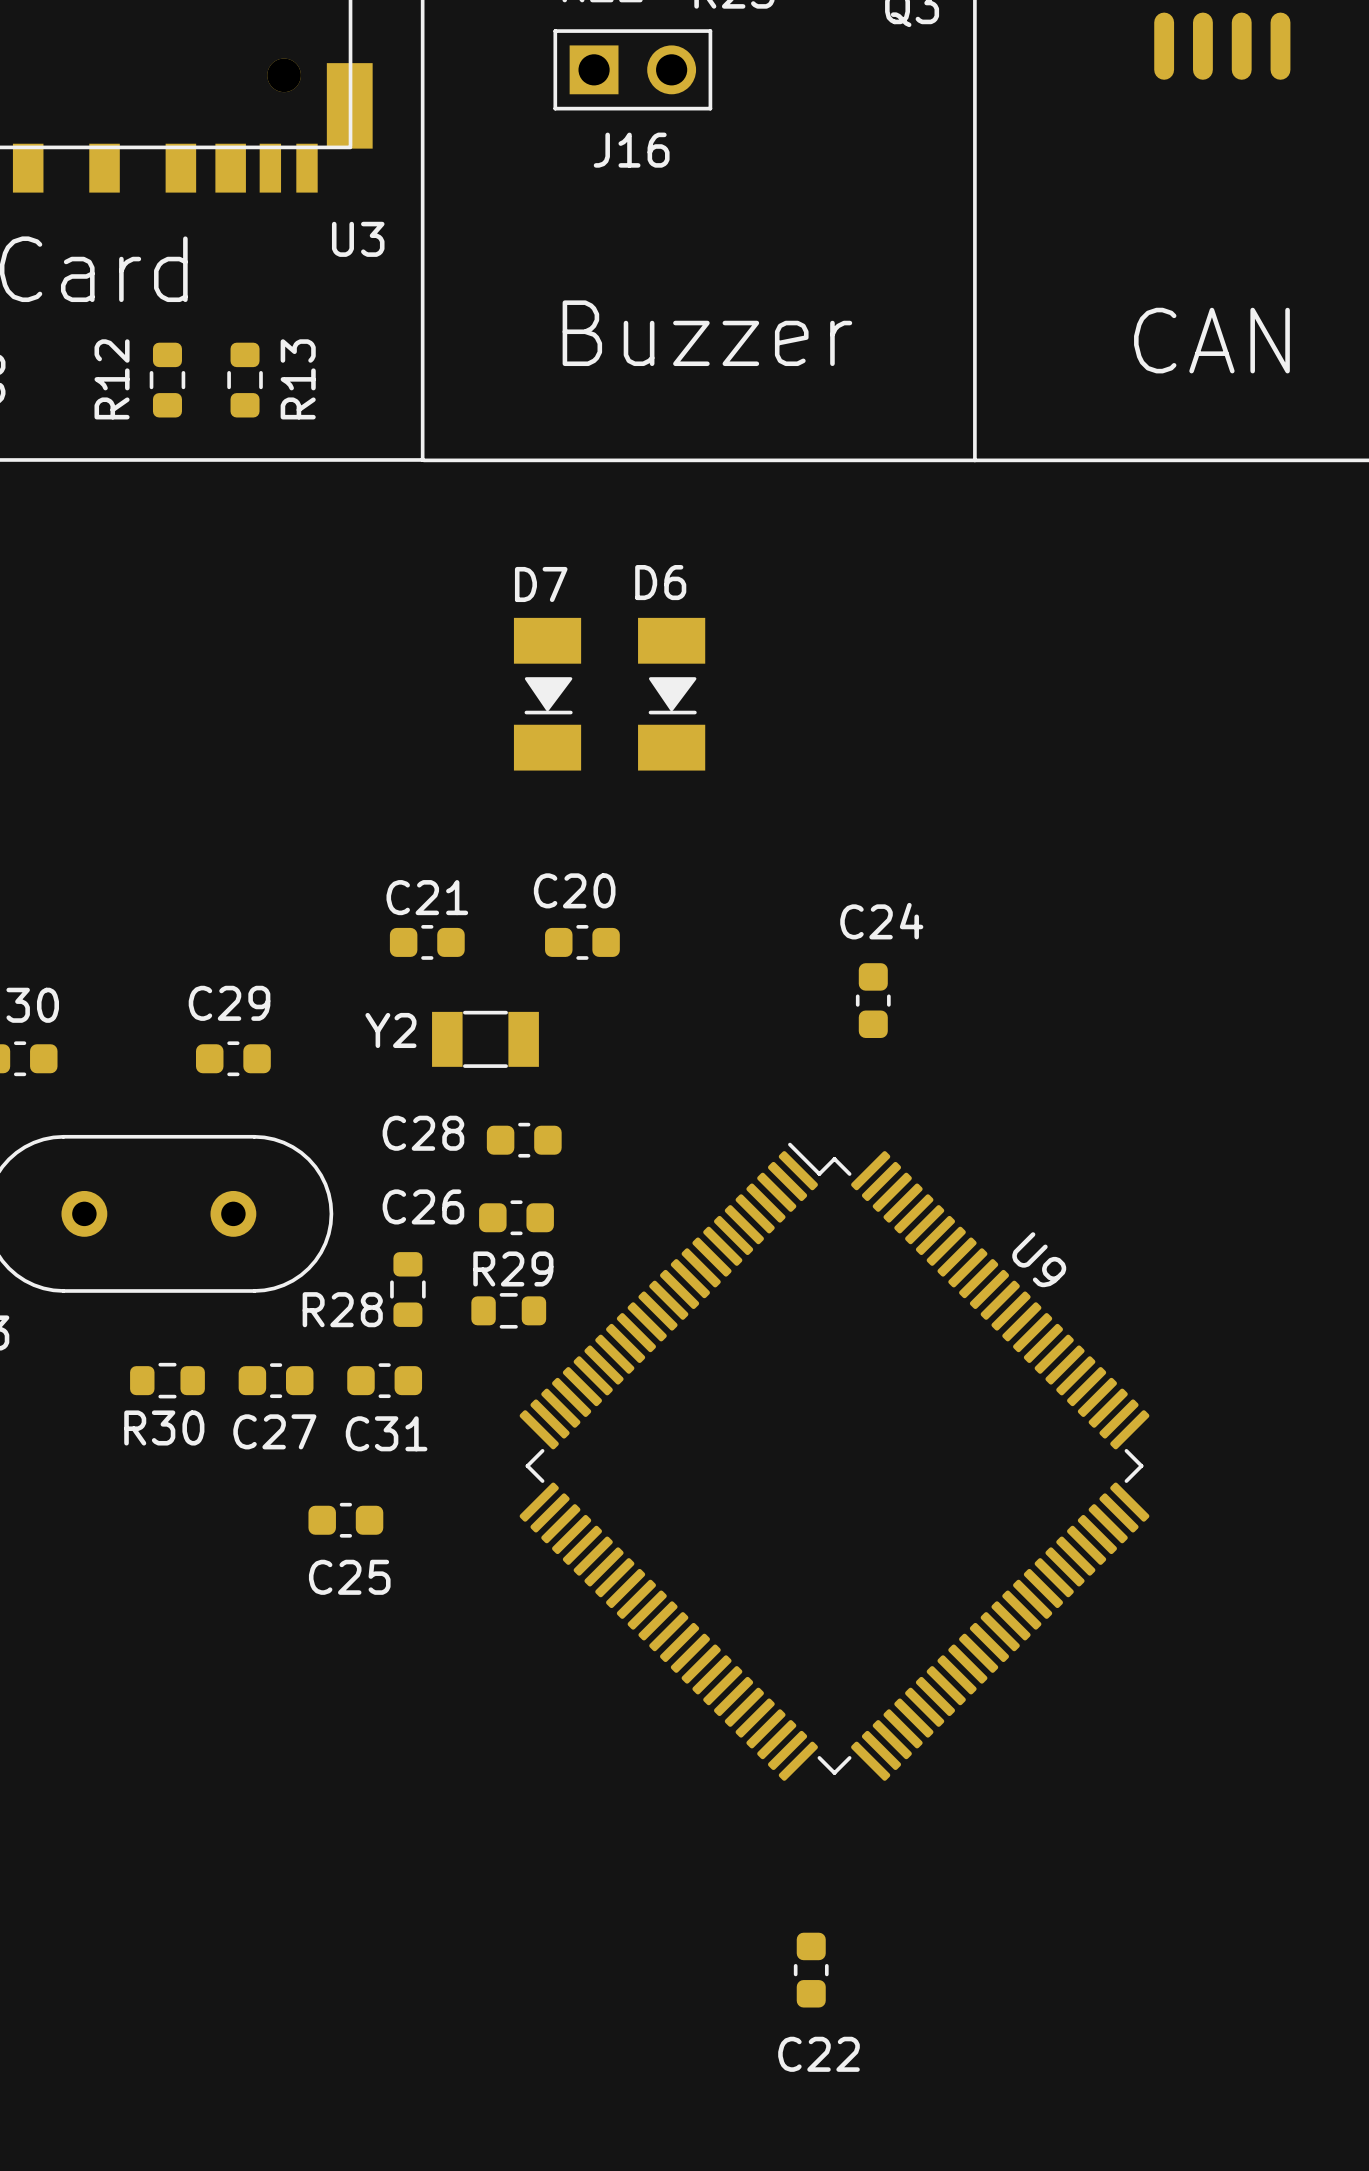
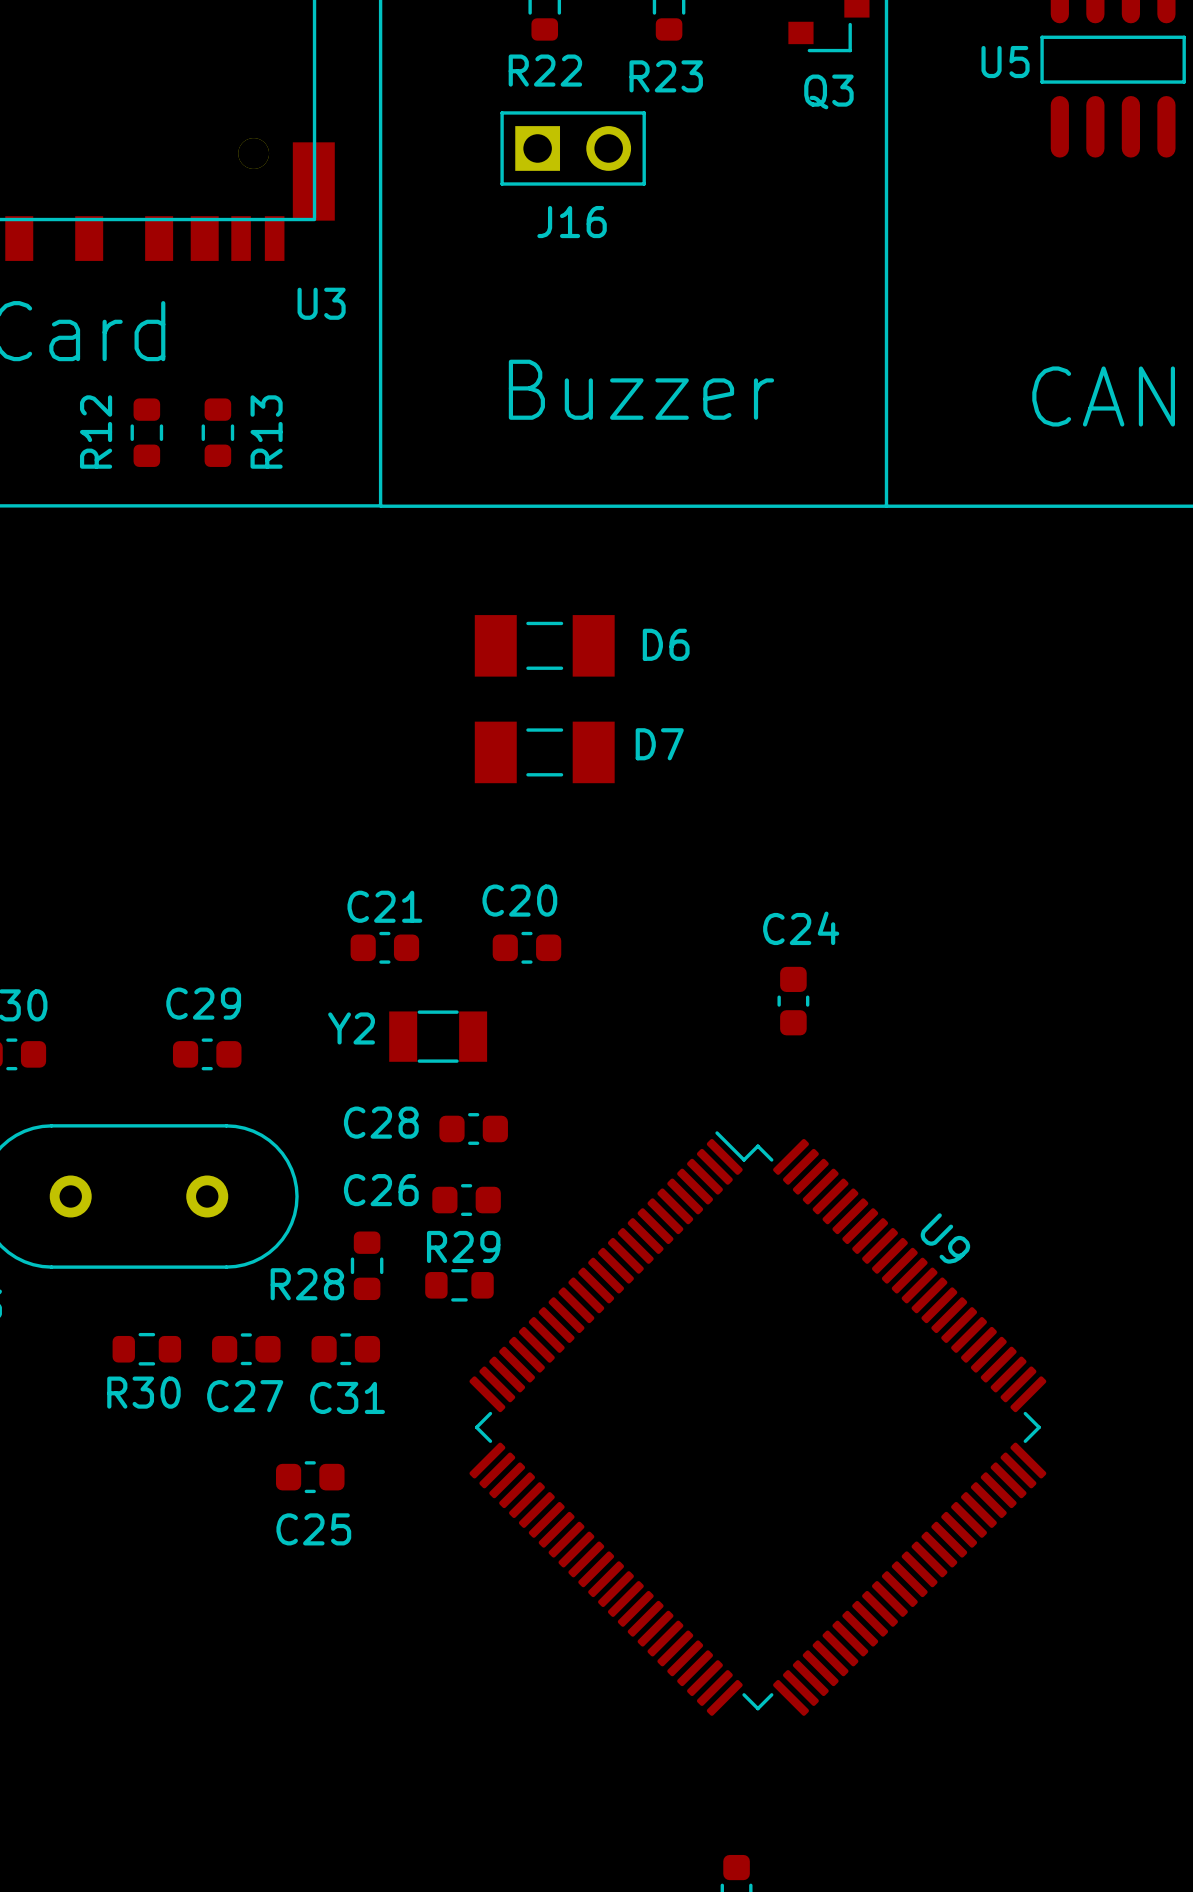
D6 name position: D6 (660, 582) -> D6 (666, 644)
D7 name position: D7 (541, 584) -> D7 (659, 744)
D7 footprint: [513, 617, 582, 771] -> [474, 721, 615, 784]
D6 footprint: [638, 617, 706, 771] -> [474, 615, 615, 677]

